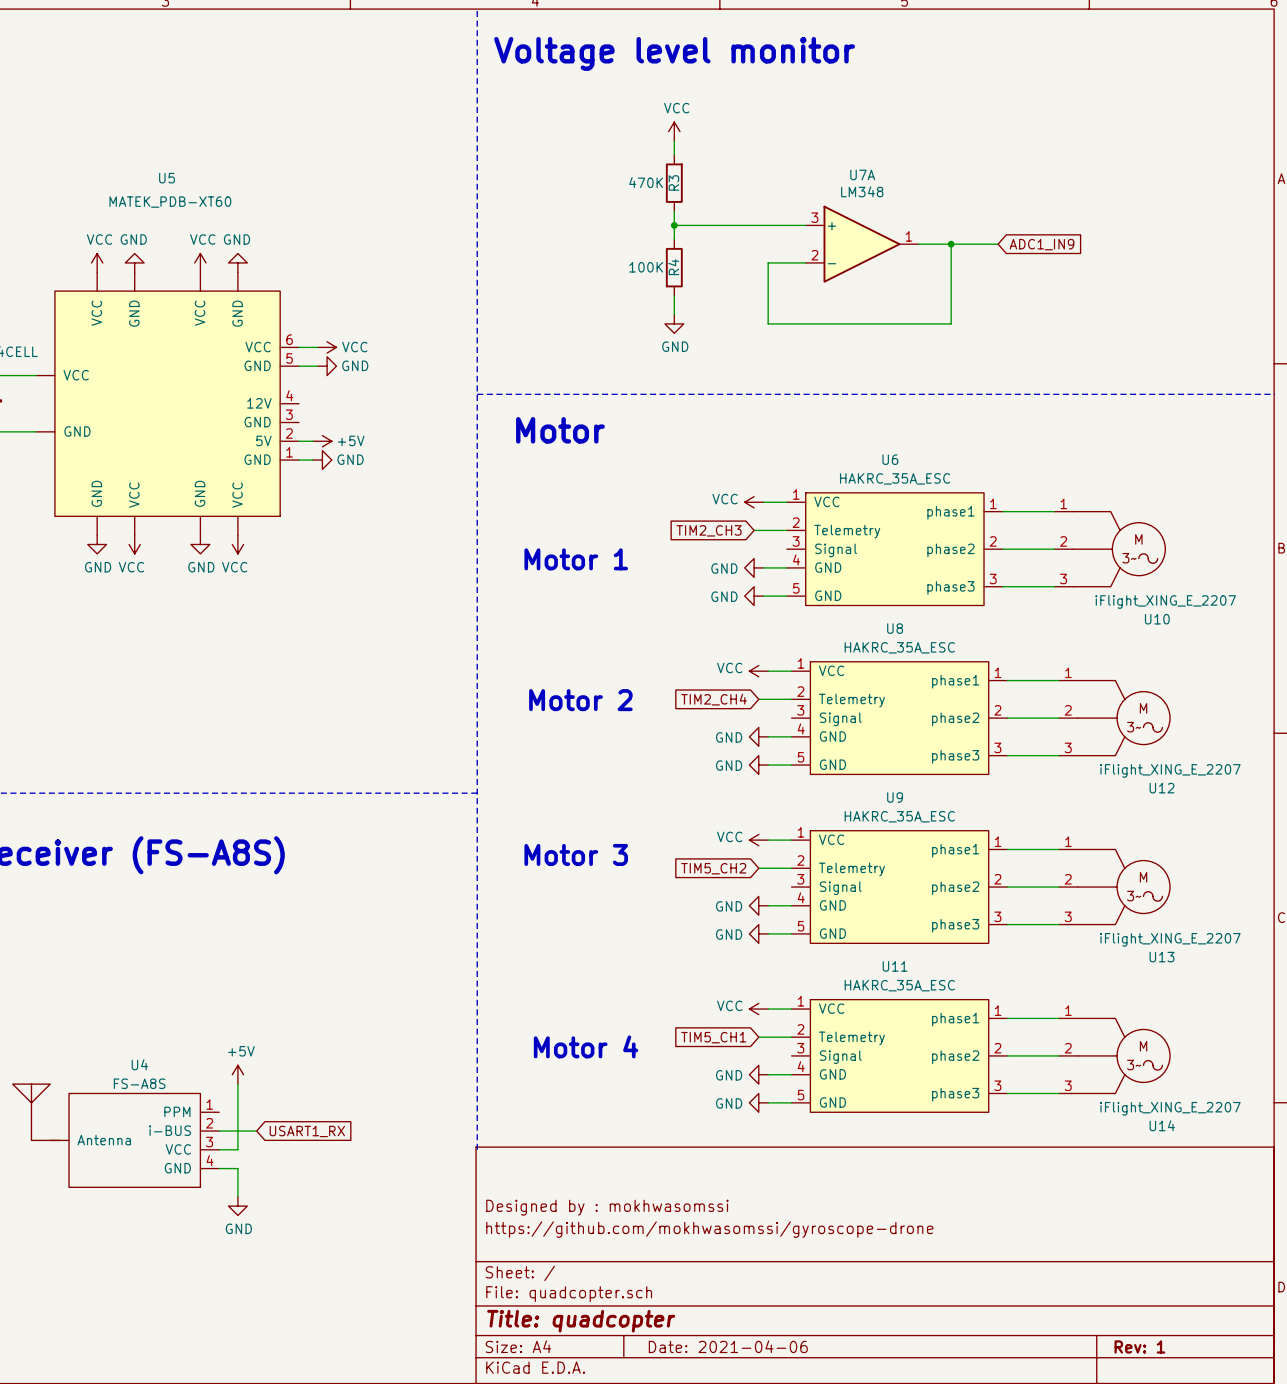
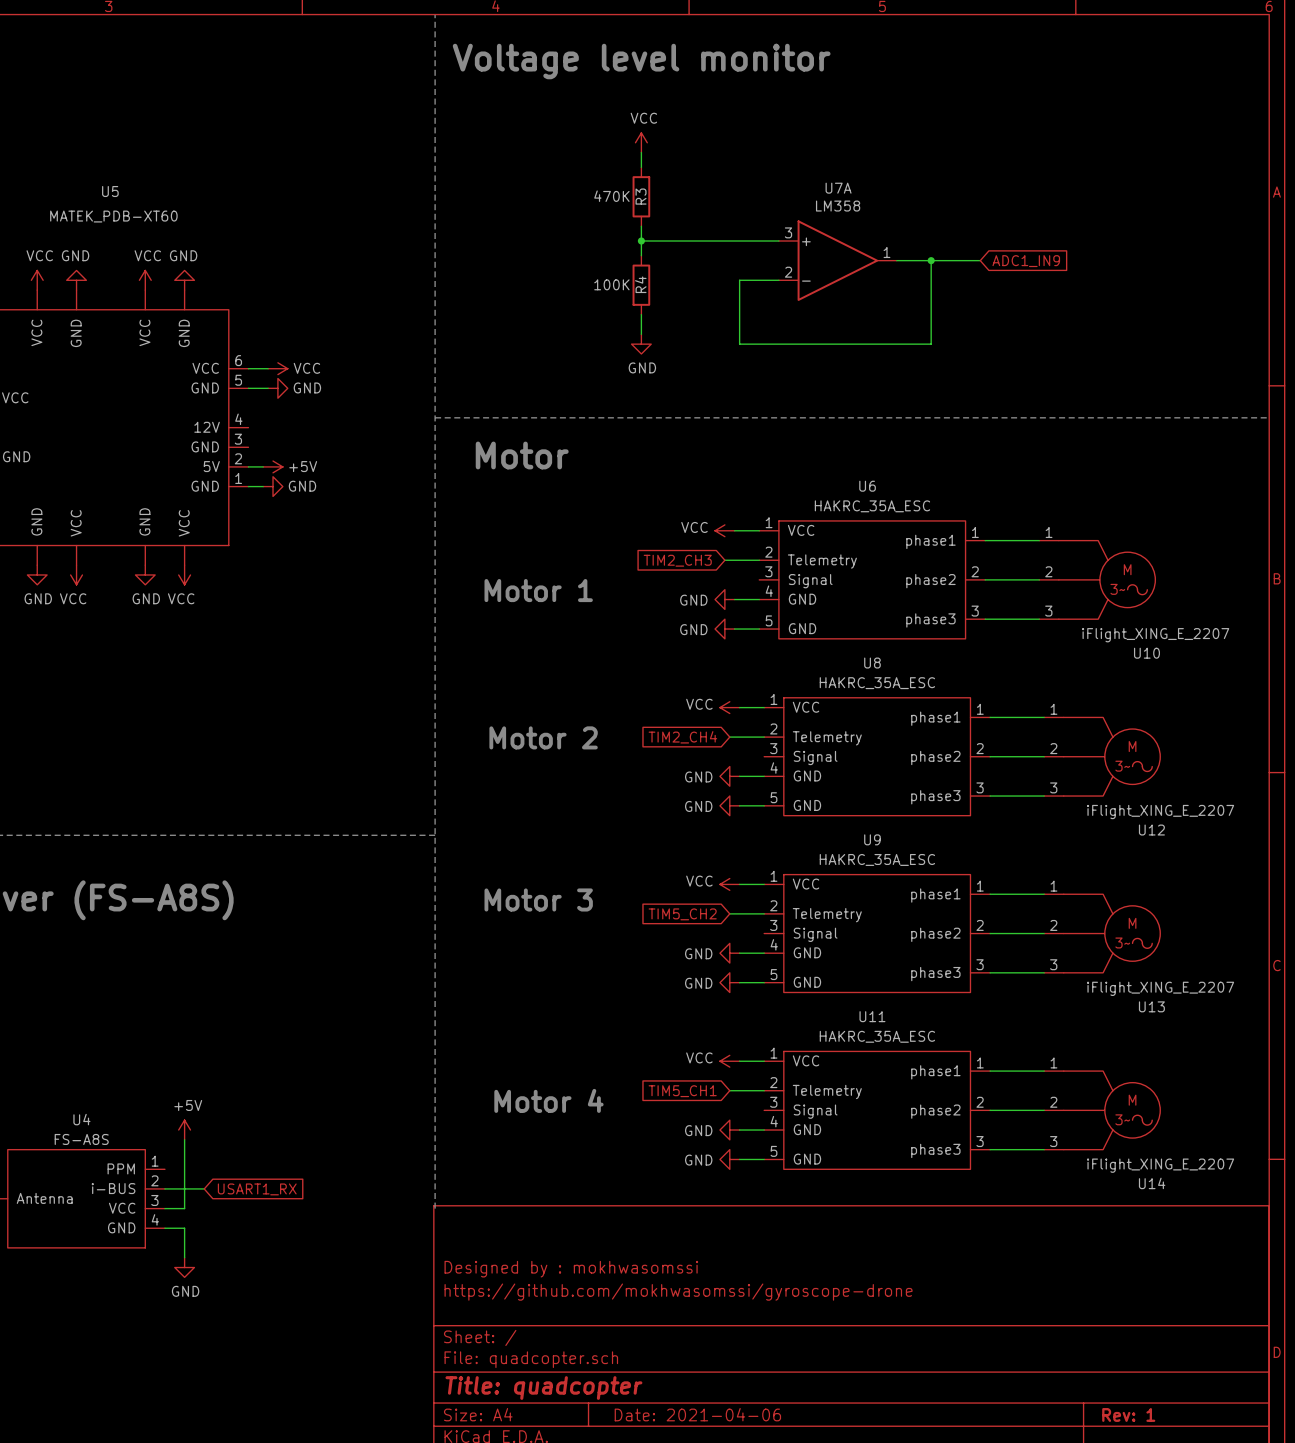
U7A value: LM348 (862, 191) -> LM358 (838, 206)

